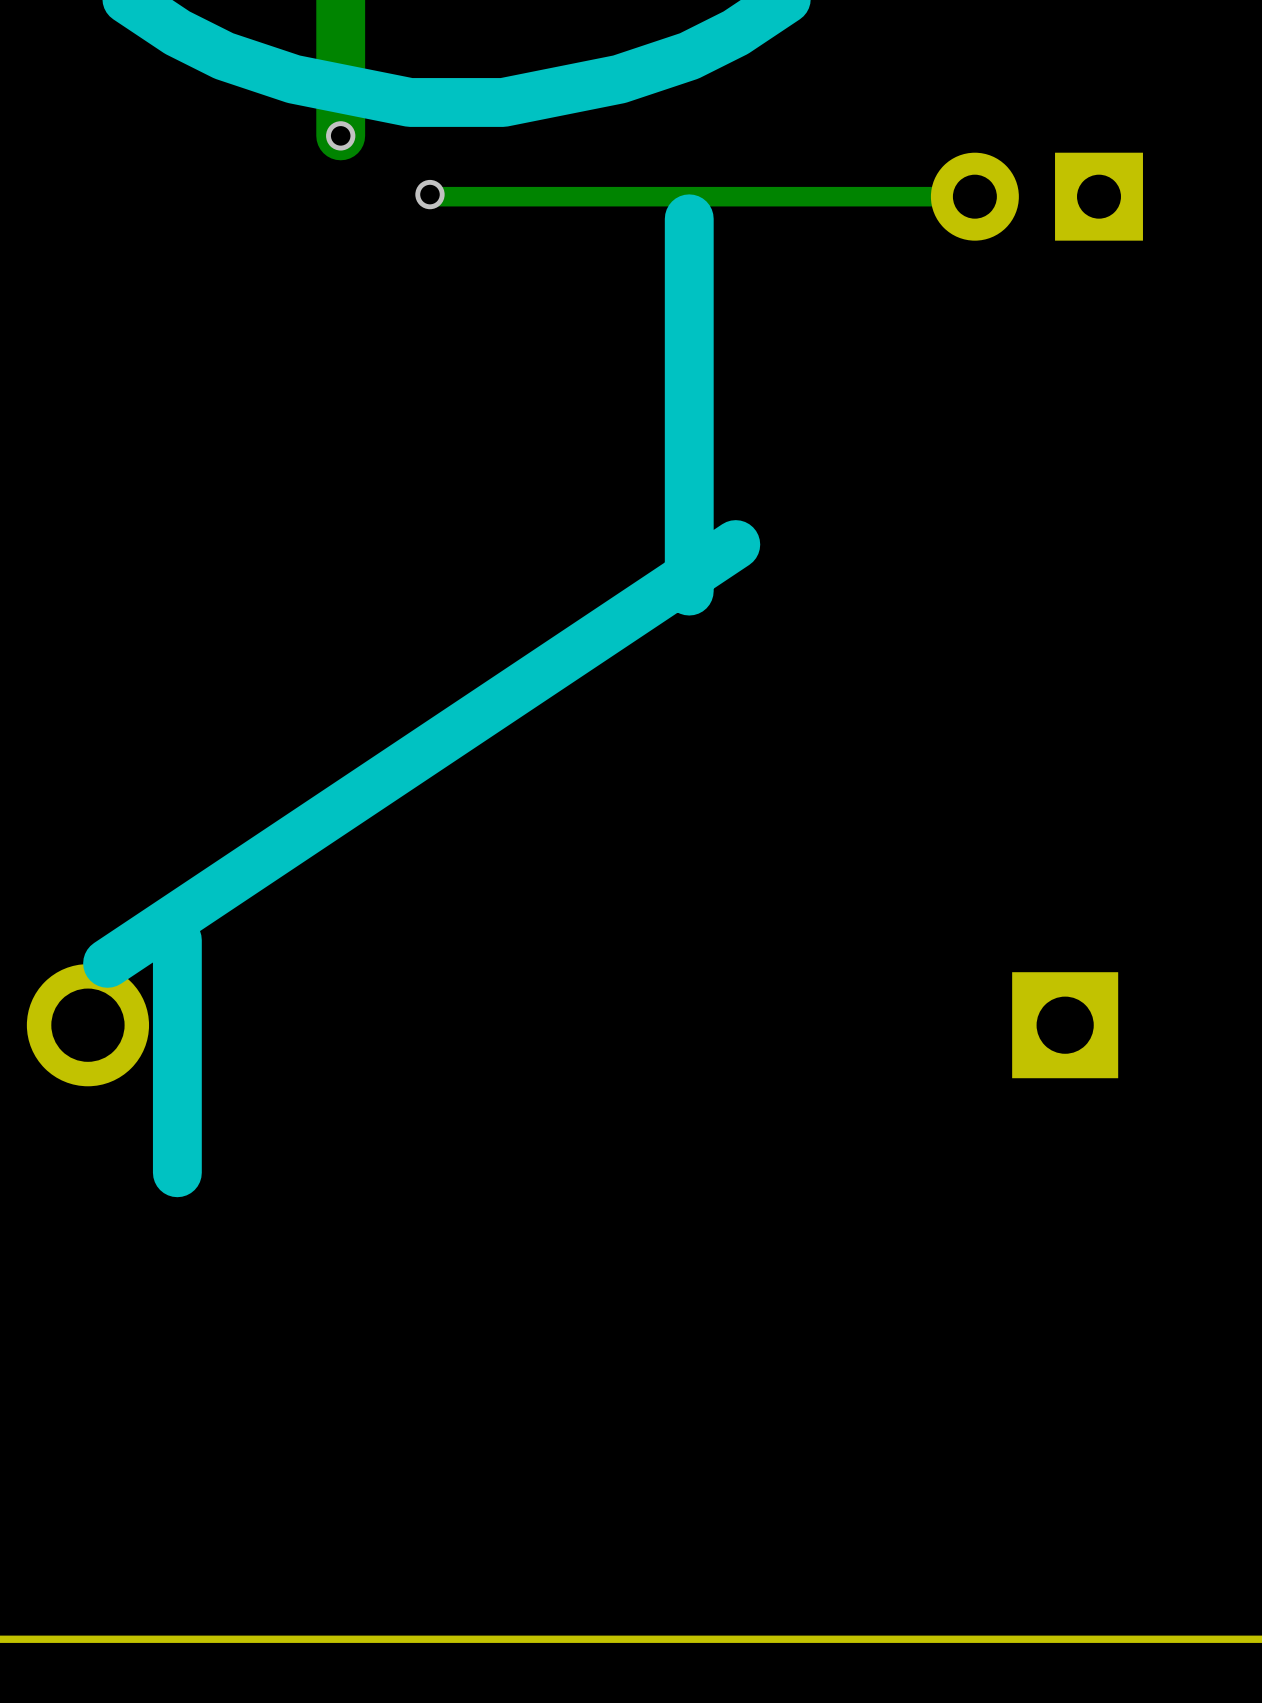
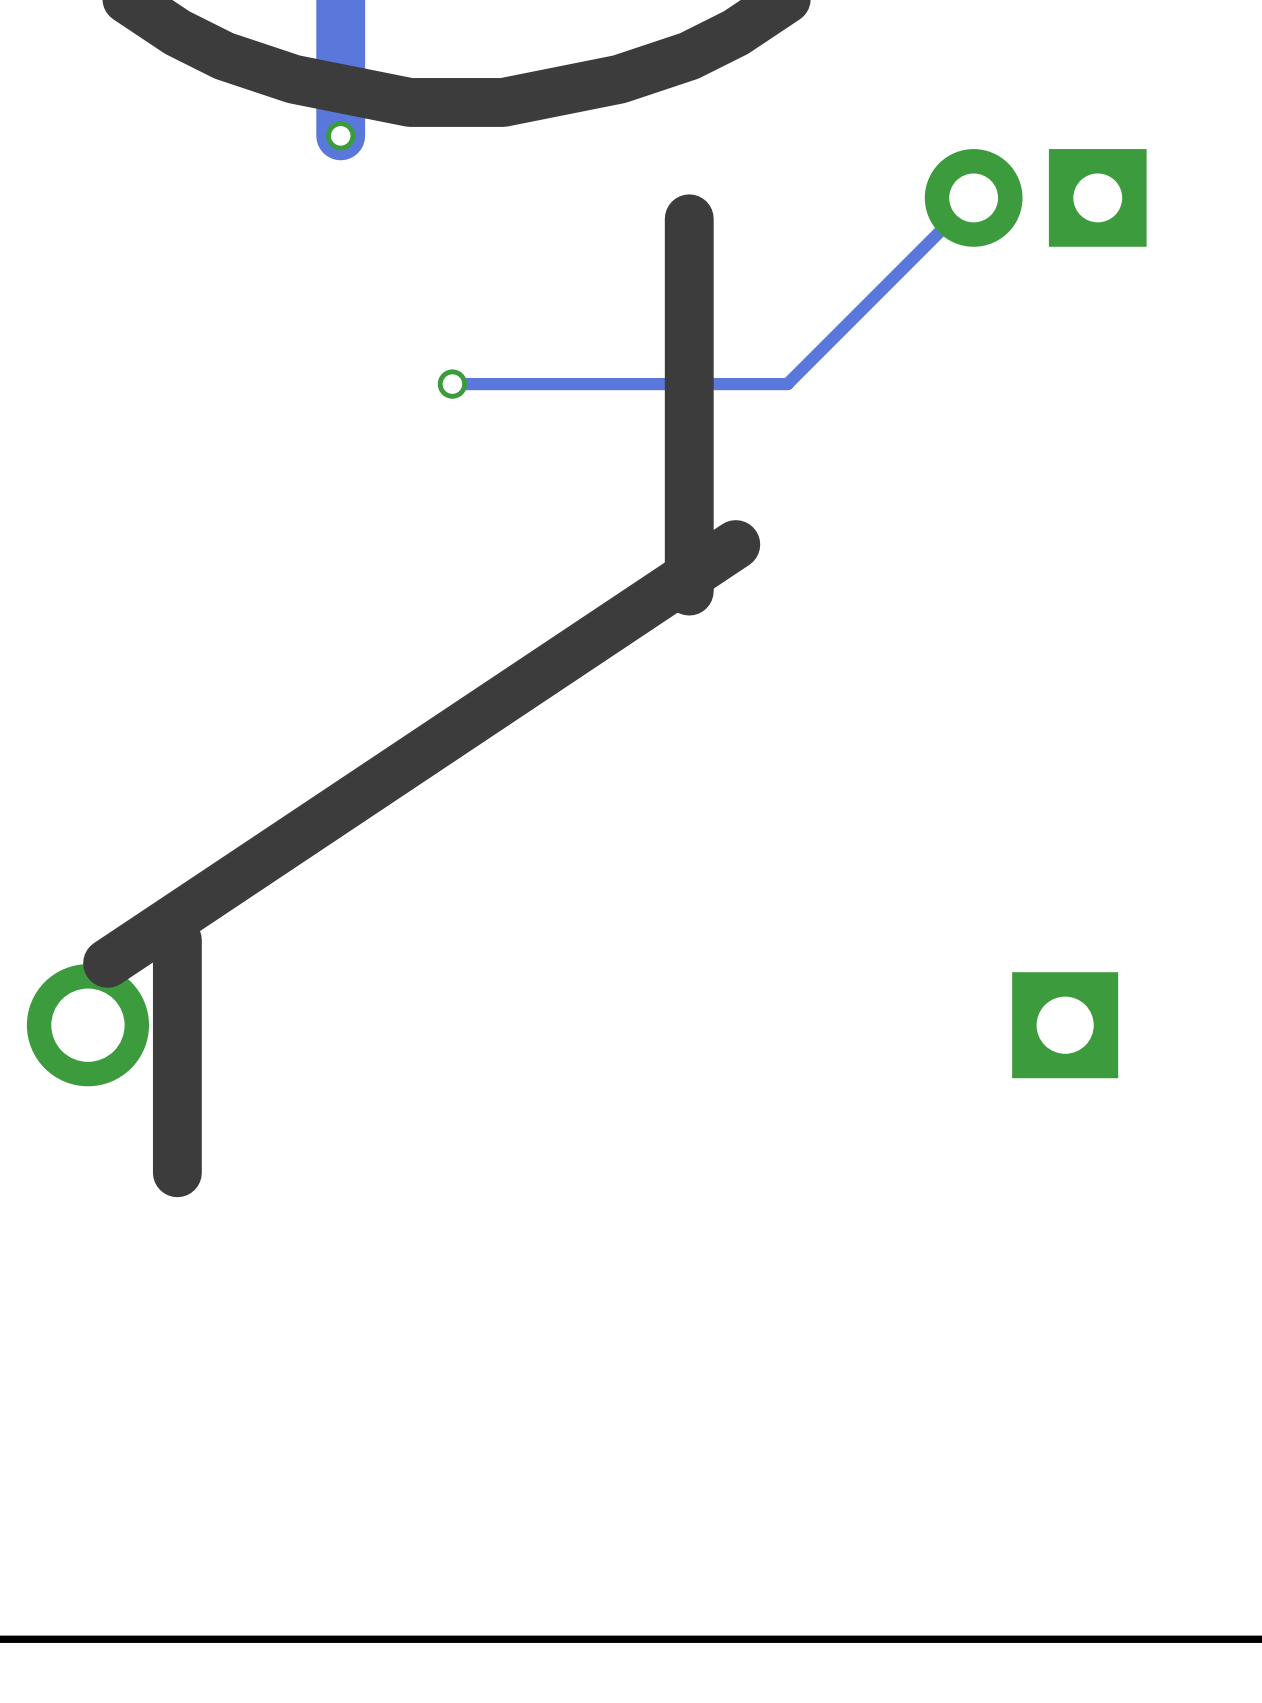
part footprint: [930, 152, 1143, 241] -> [924, 149, 1147, 247]
via position: (429, 194) -> (452, 384)
track: (972, 194) (974, 196) (432, 196) (429, 194) -> none
track: none -> (973, 197) (787, 384) (452, 384)

